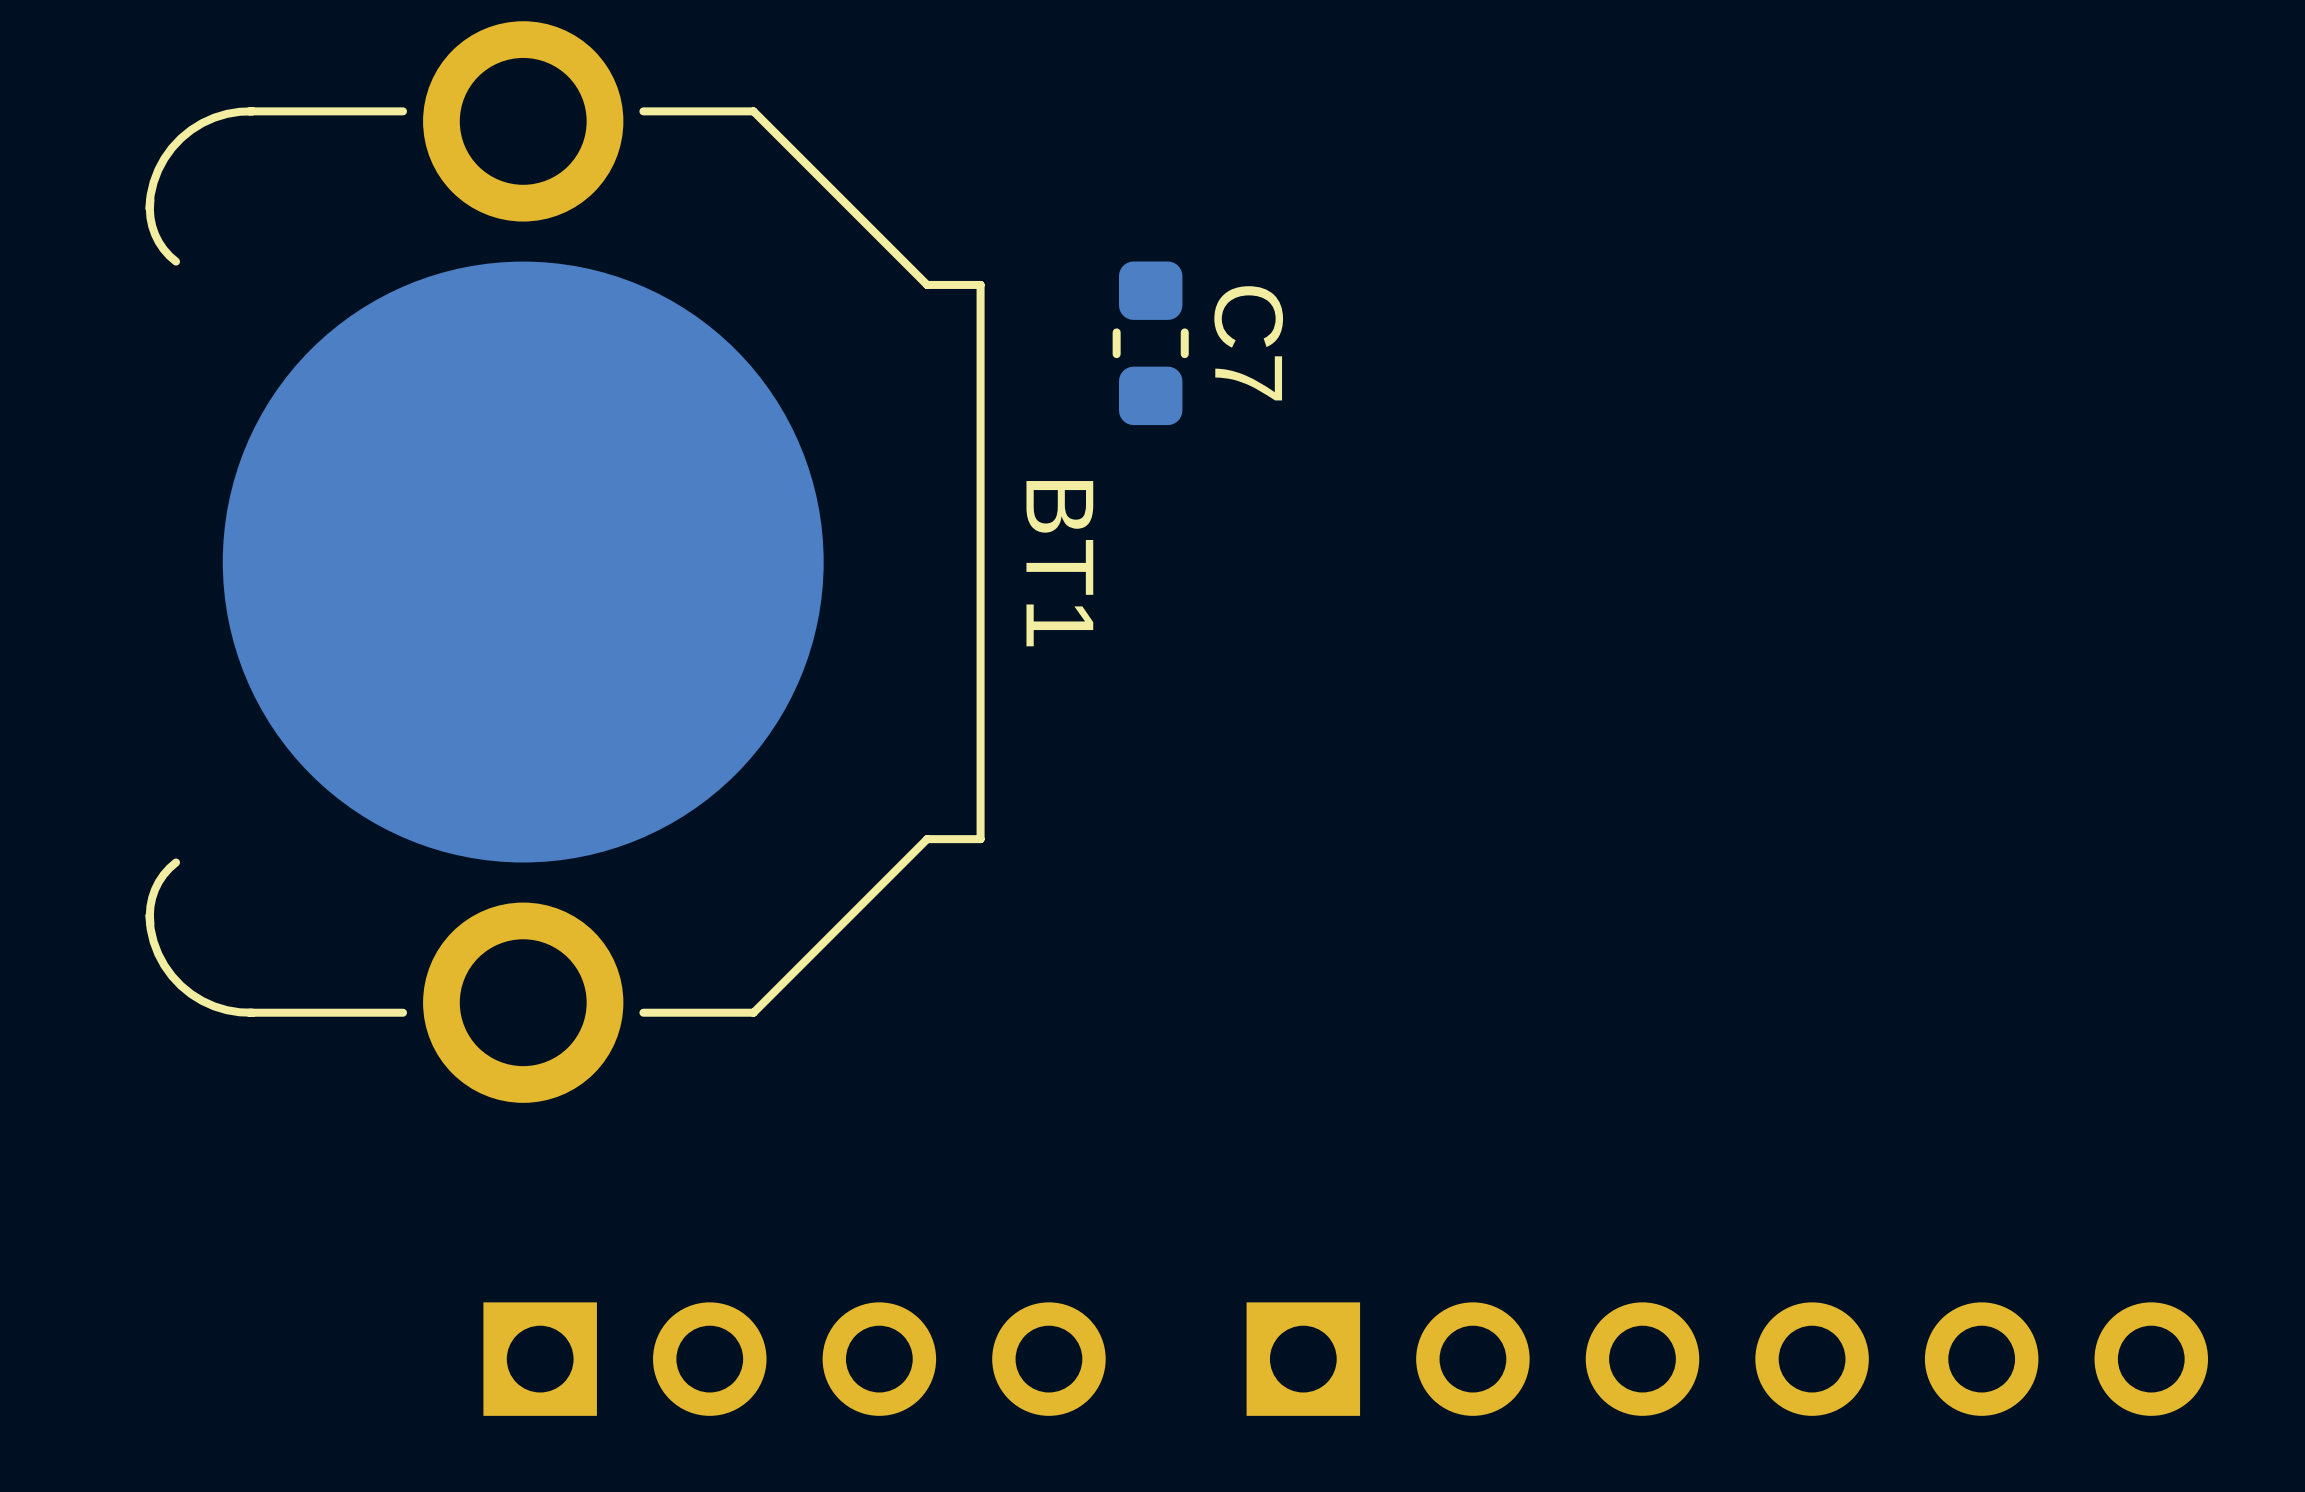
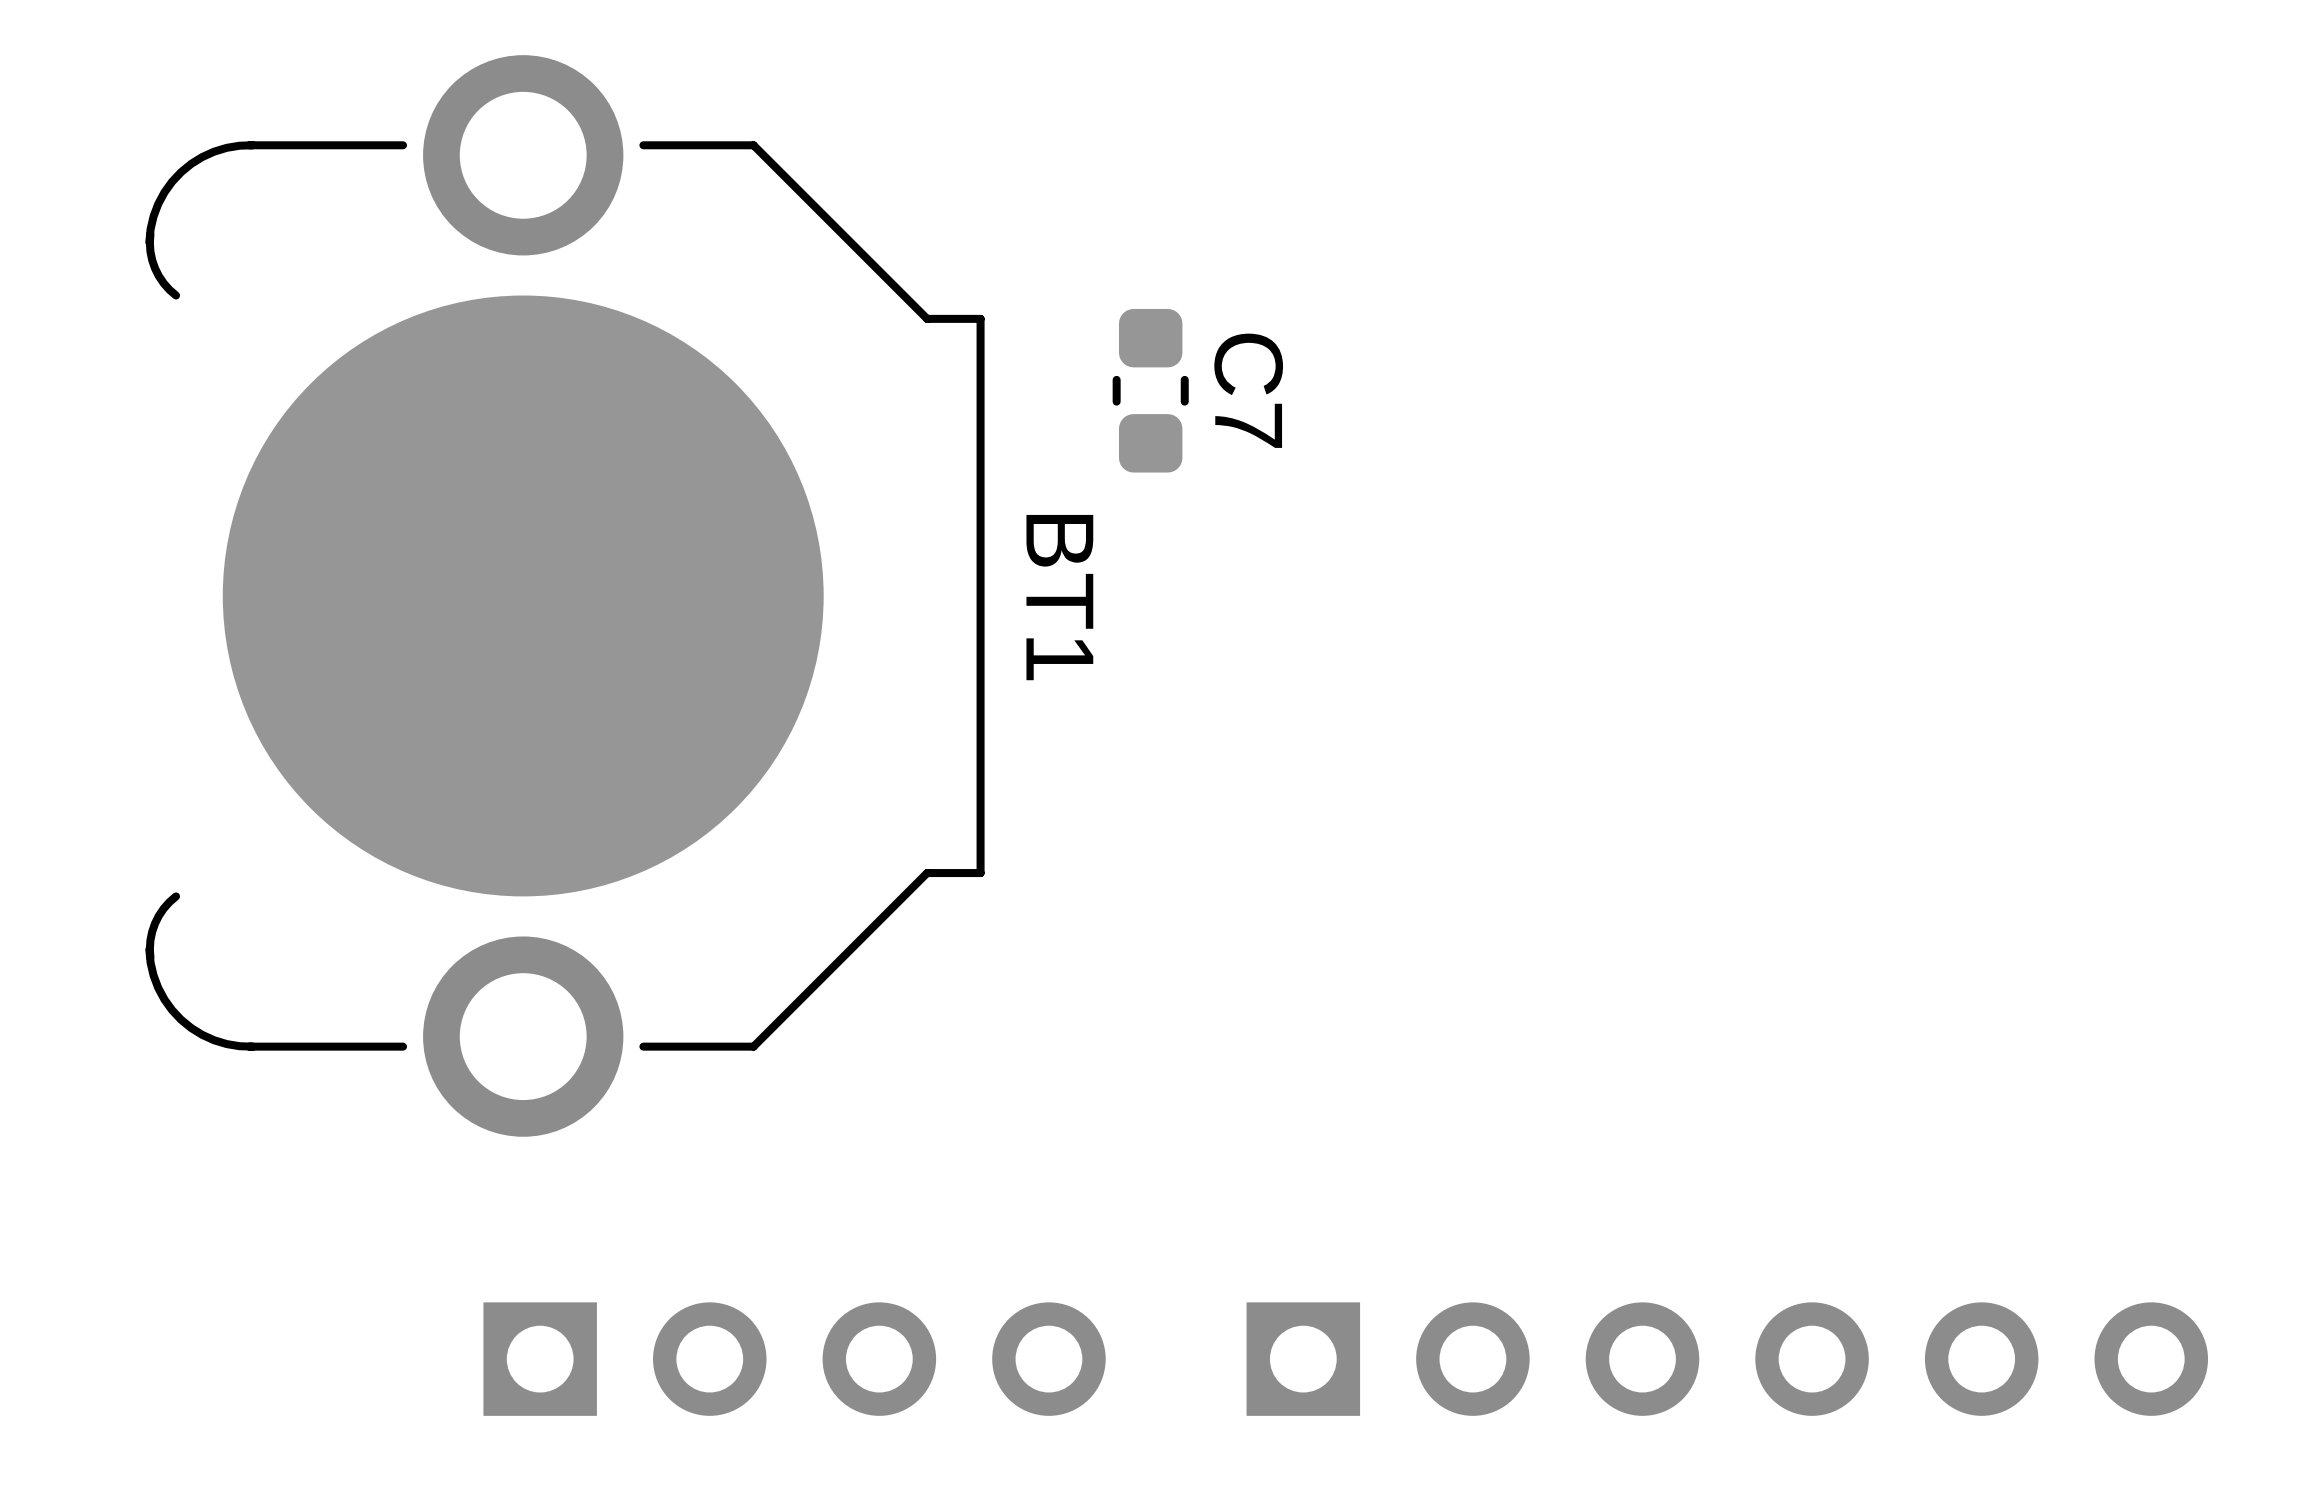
C7 position: (1150, 343) -> (1150, 390)
BT1 position: (564, 562) -> (564, 595)

